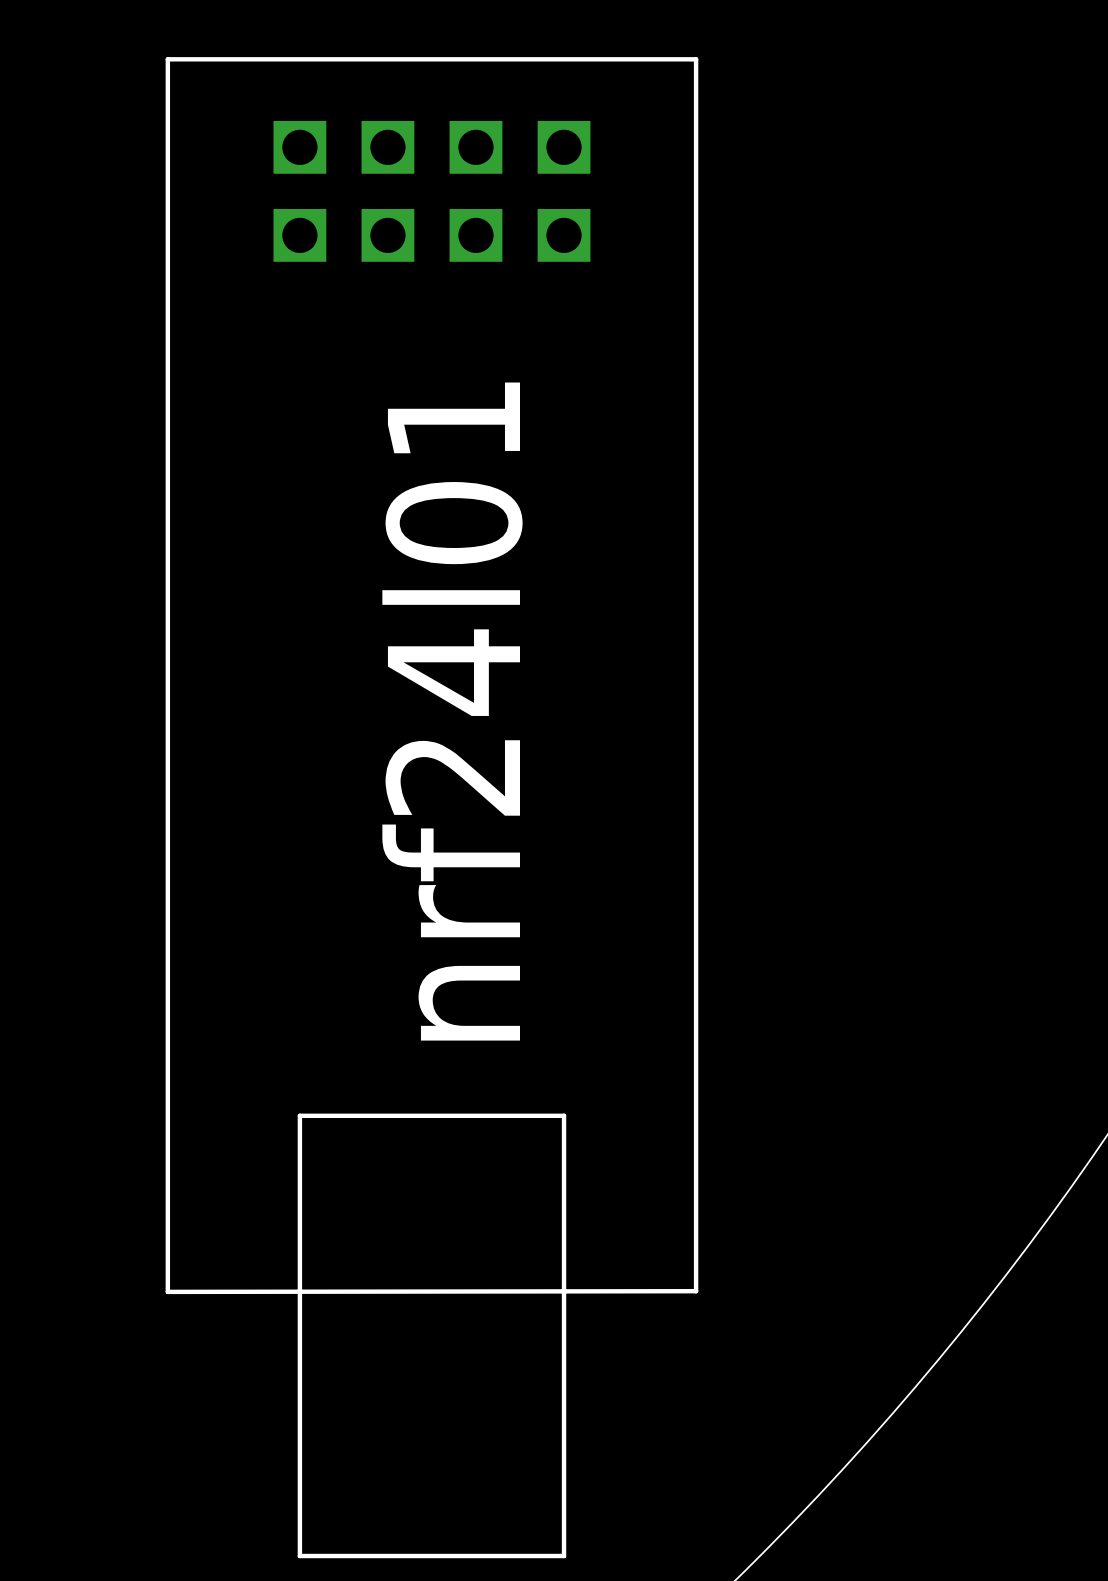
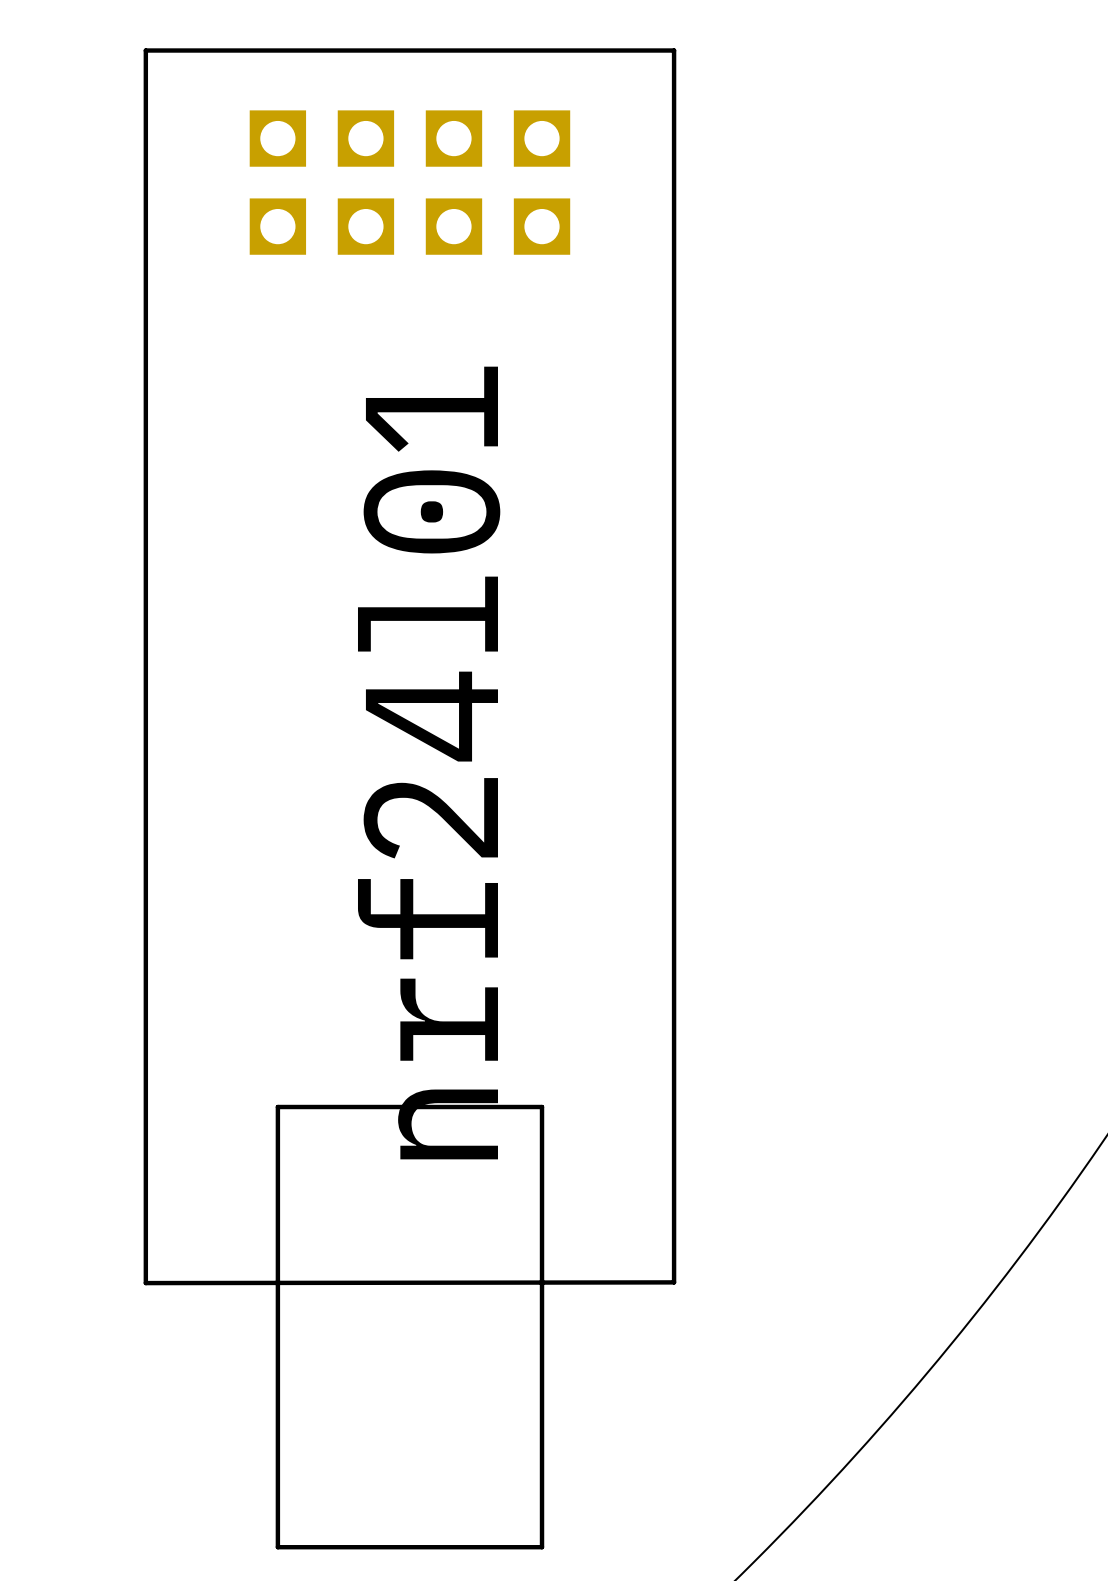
part footprint: [165, 57, 699, 1559] -> [143, 48, 677, 1550]

